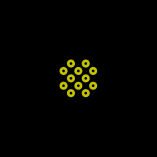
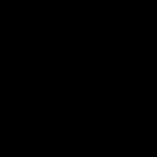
part: (78, 78) -> none

